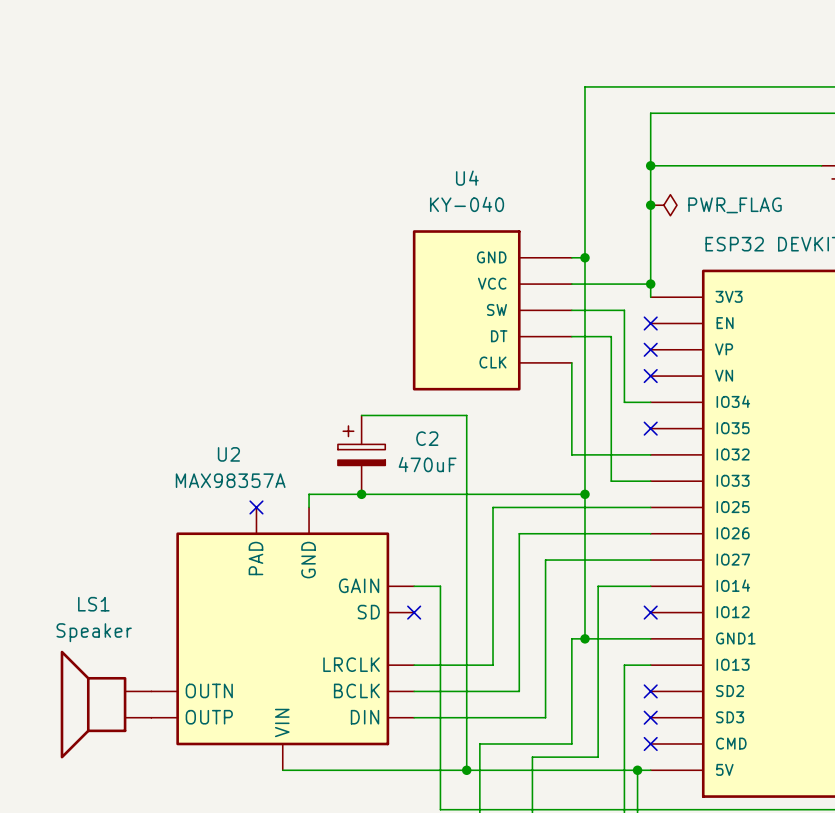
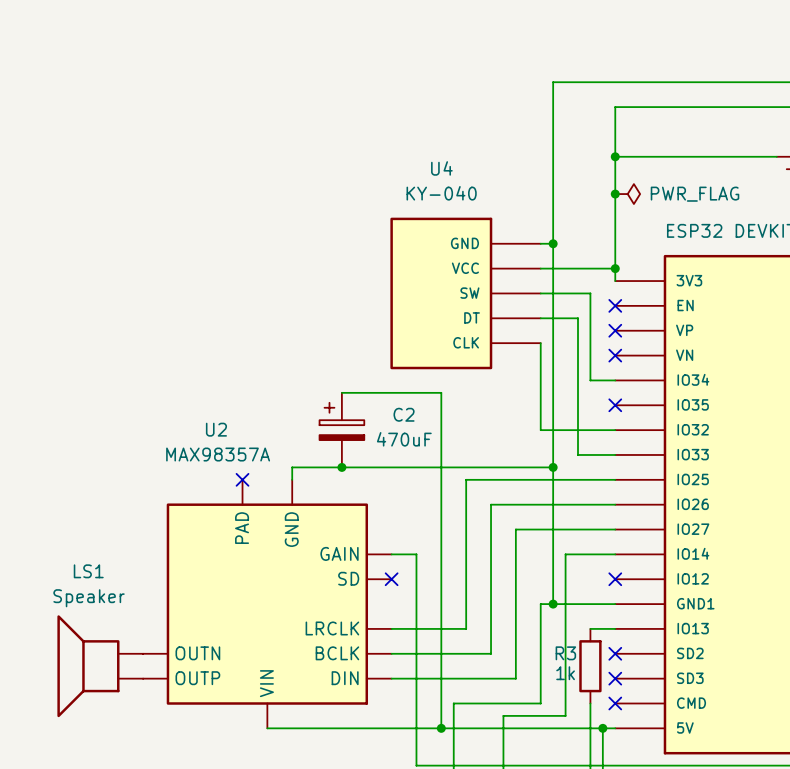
wire: (624, 665) (624, 743) -> none
R3: none -> 1k (590, 666)

